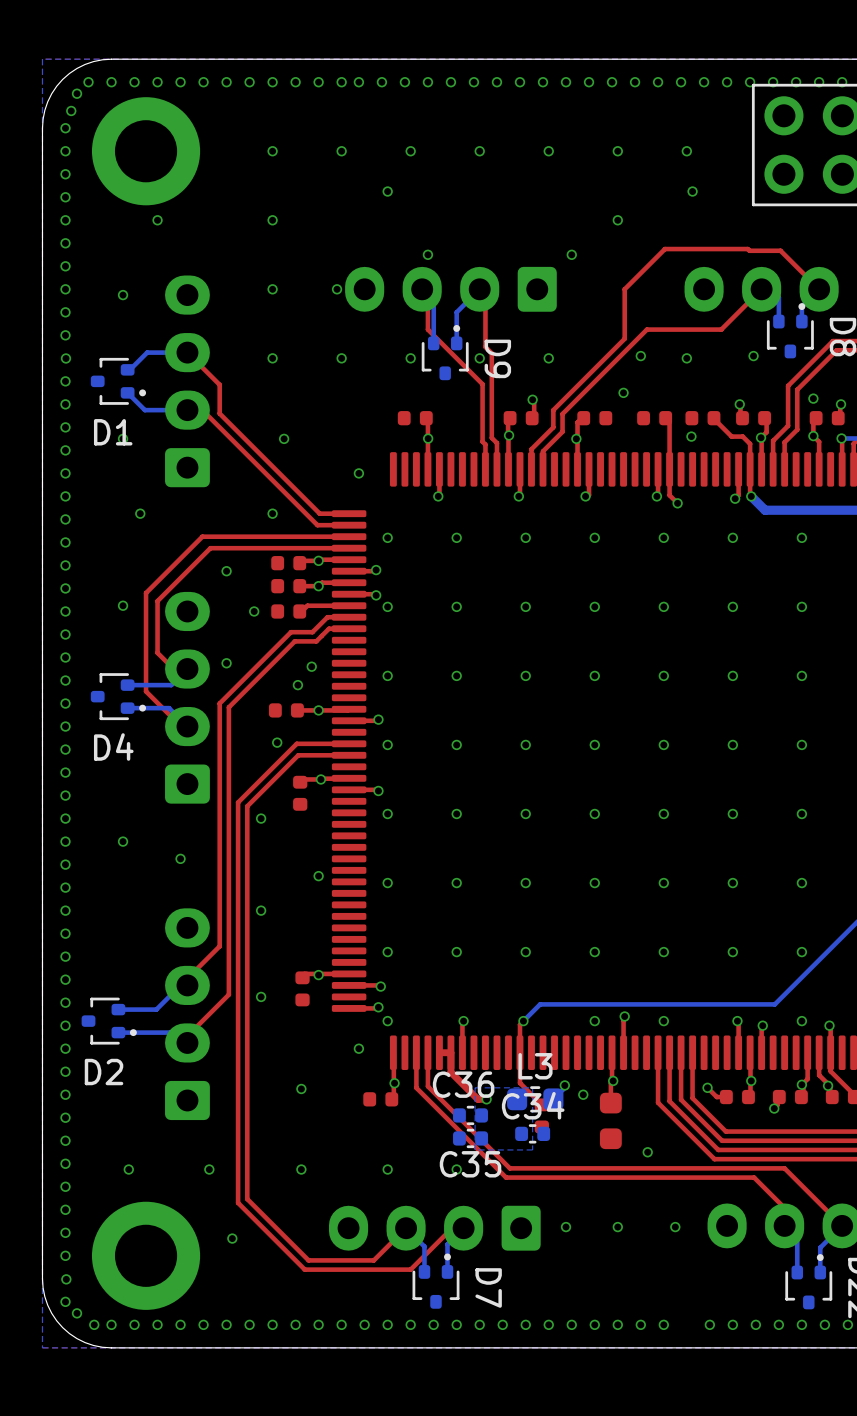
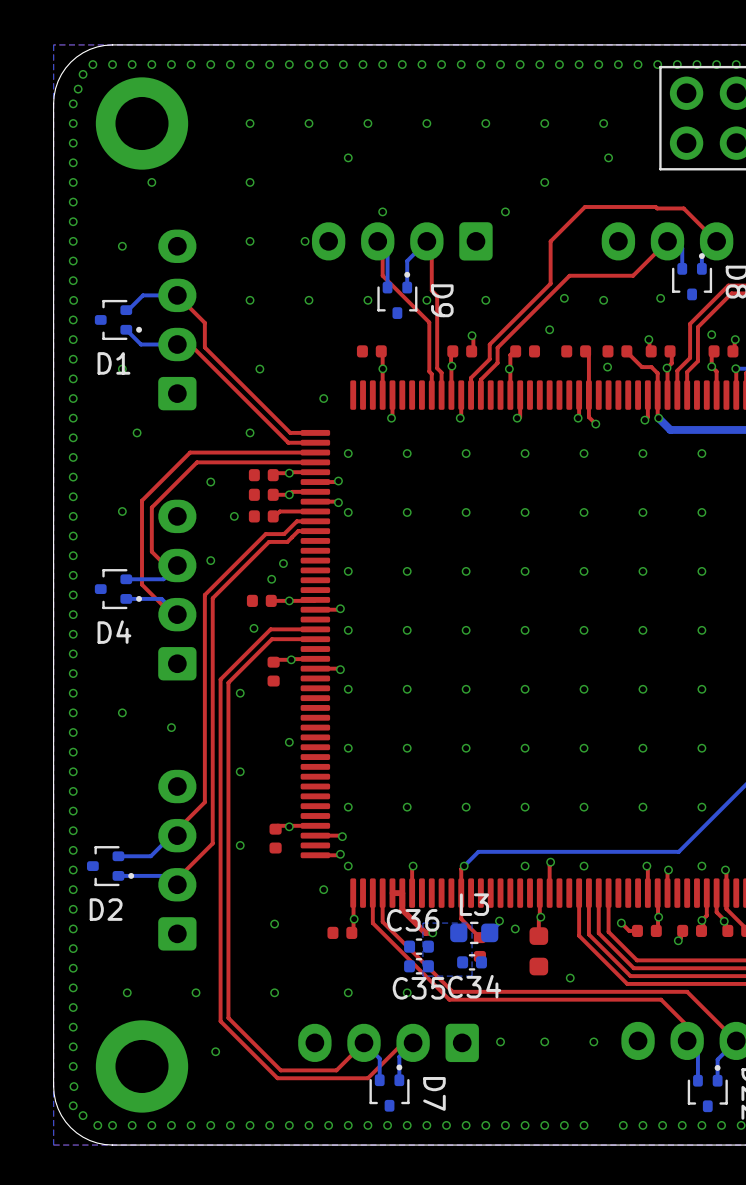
C34 name position: C34 (533, 1105) -> C34 (474, 986)

